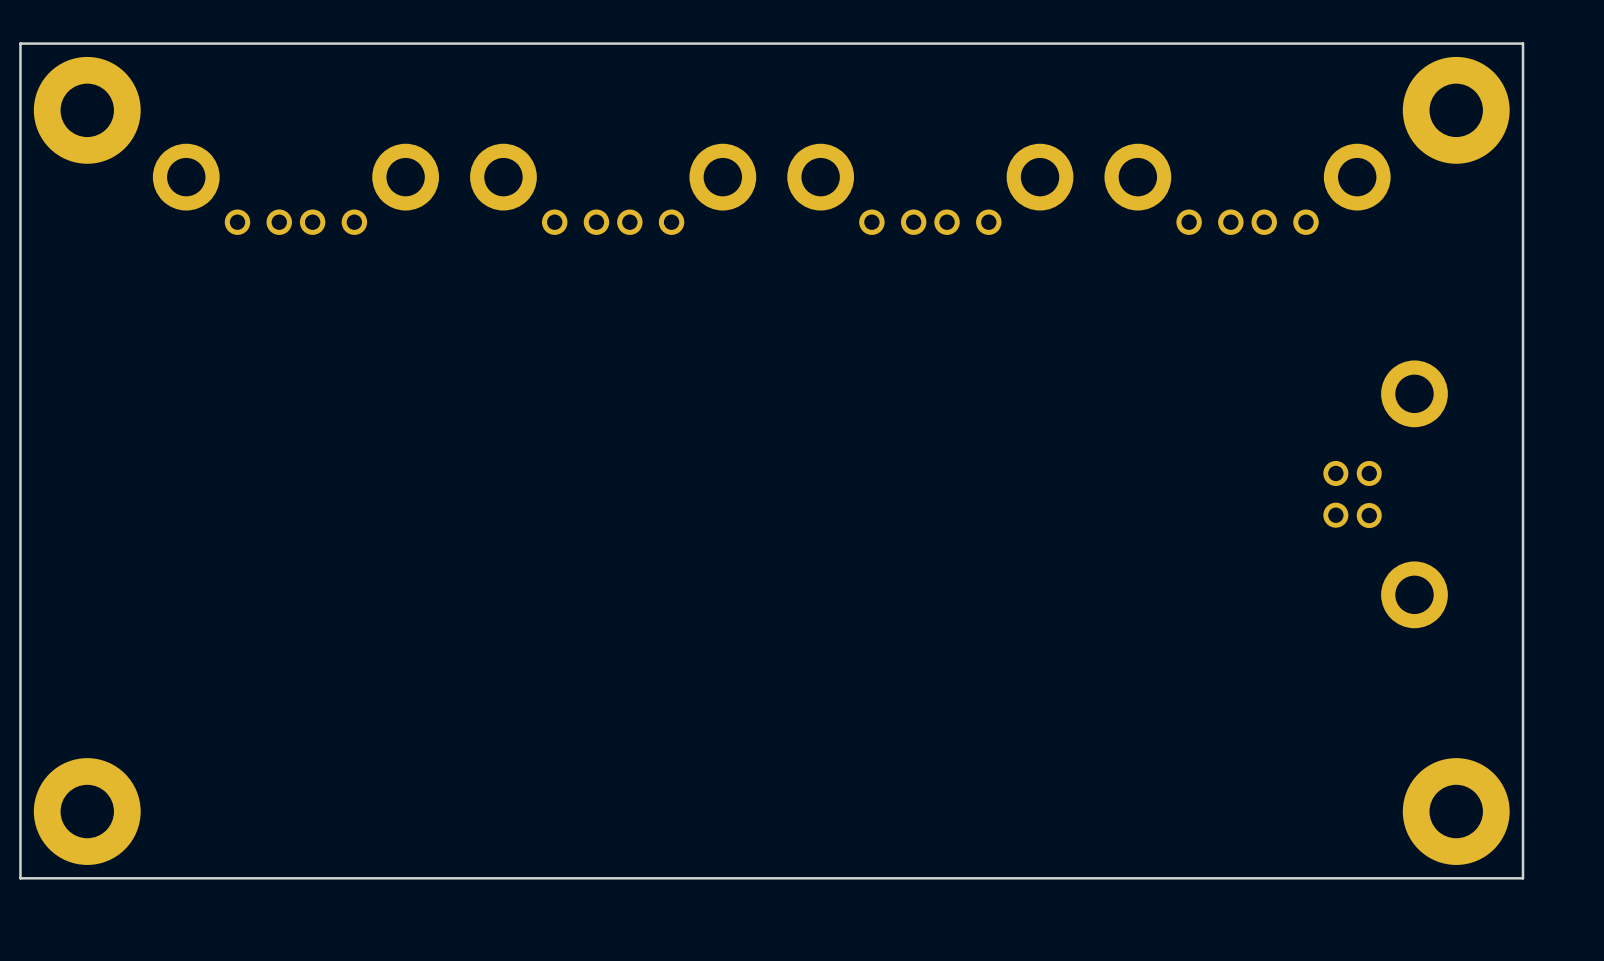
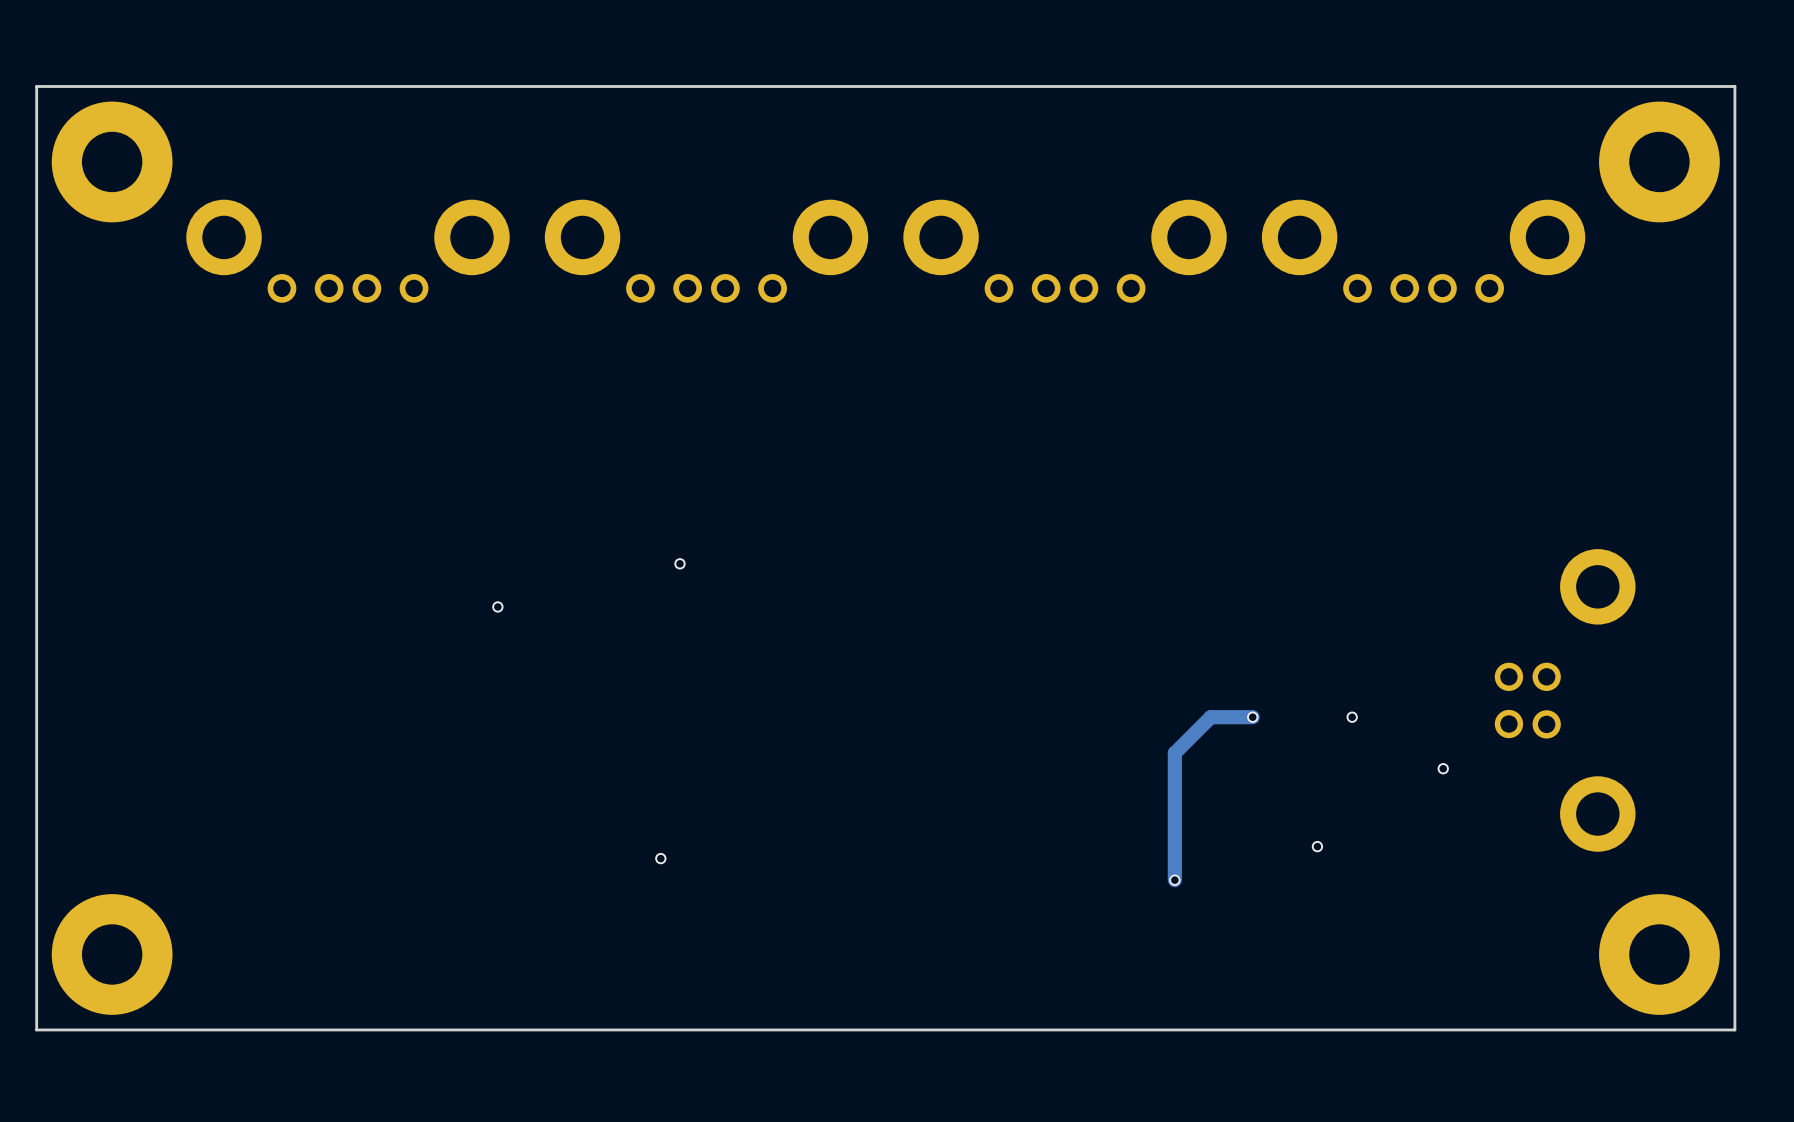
via: none -> (679, 563)
part position: (1385, 494) -> (1565, 700)
via: none -> (497, 606)
track: none -> (1252, 717) (1210, 717) (1174, 753) (1174, 880)
via: none -> (1252, 717)
via: none -> (1352, 717)
via: none -> (1443, 768)
via: none -> (1317, 846)
via: none -> (660, 858)
via: none -> (1174, 880)

